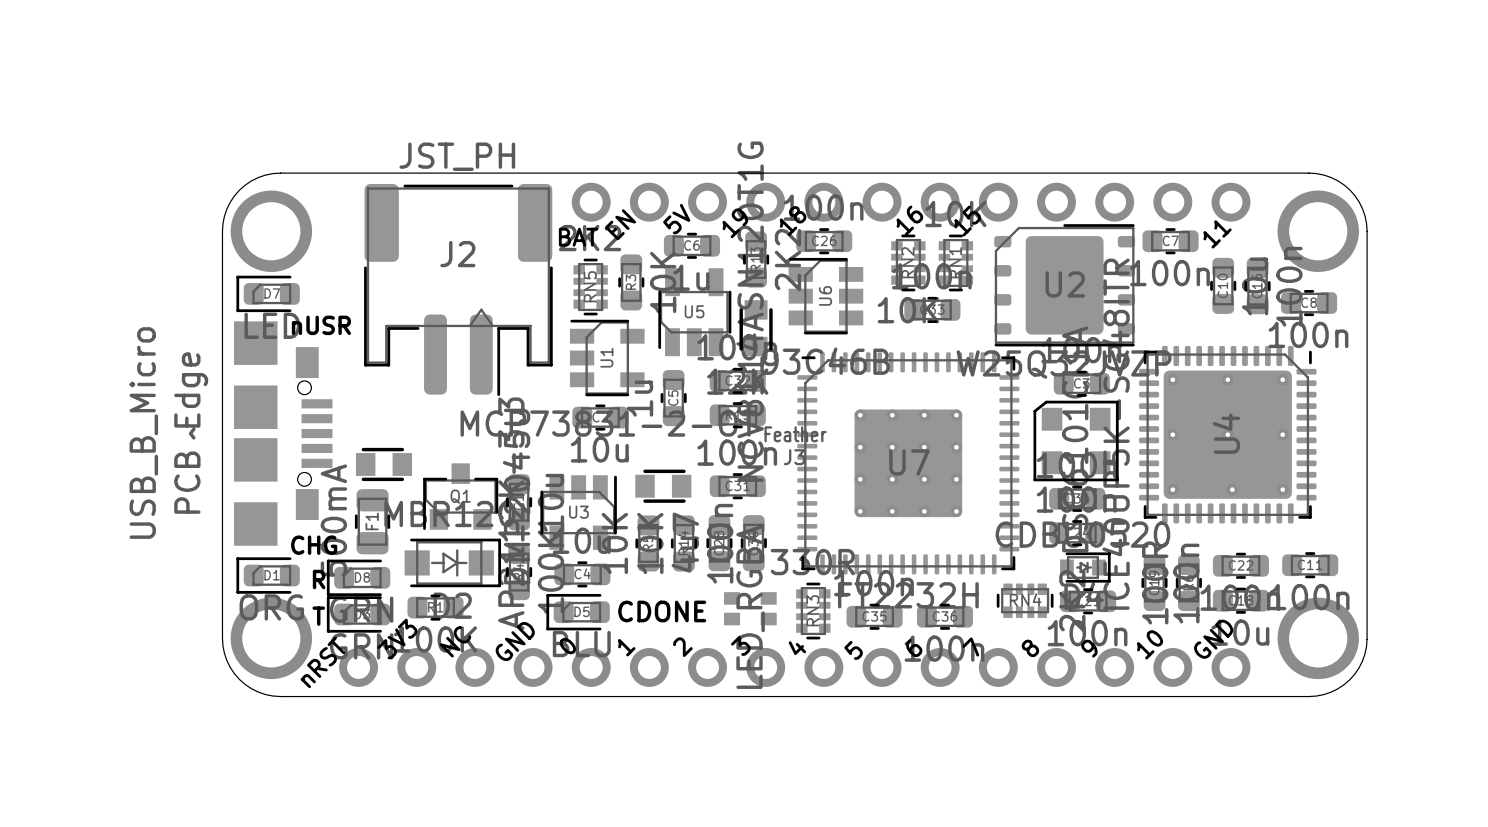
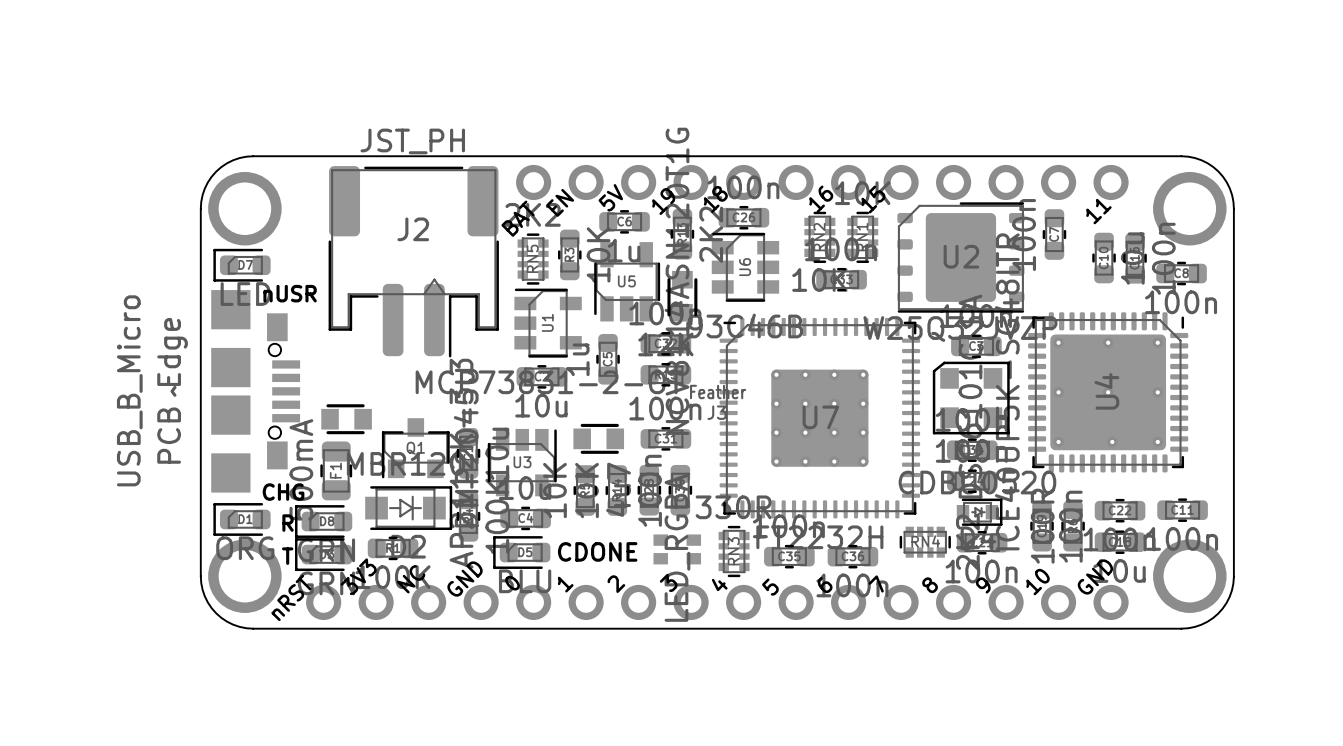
text rotation: 0° (578, 237) -> 45° counterclockwise (518, 218)
C7 rotation: 0° (1170, 241) -> 90° clockwise (1054, 234)

